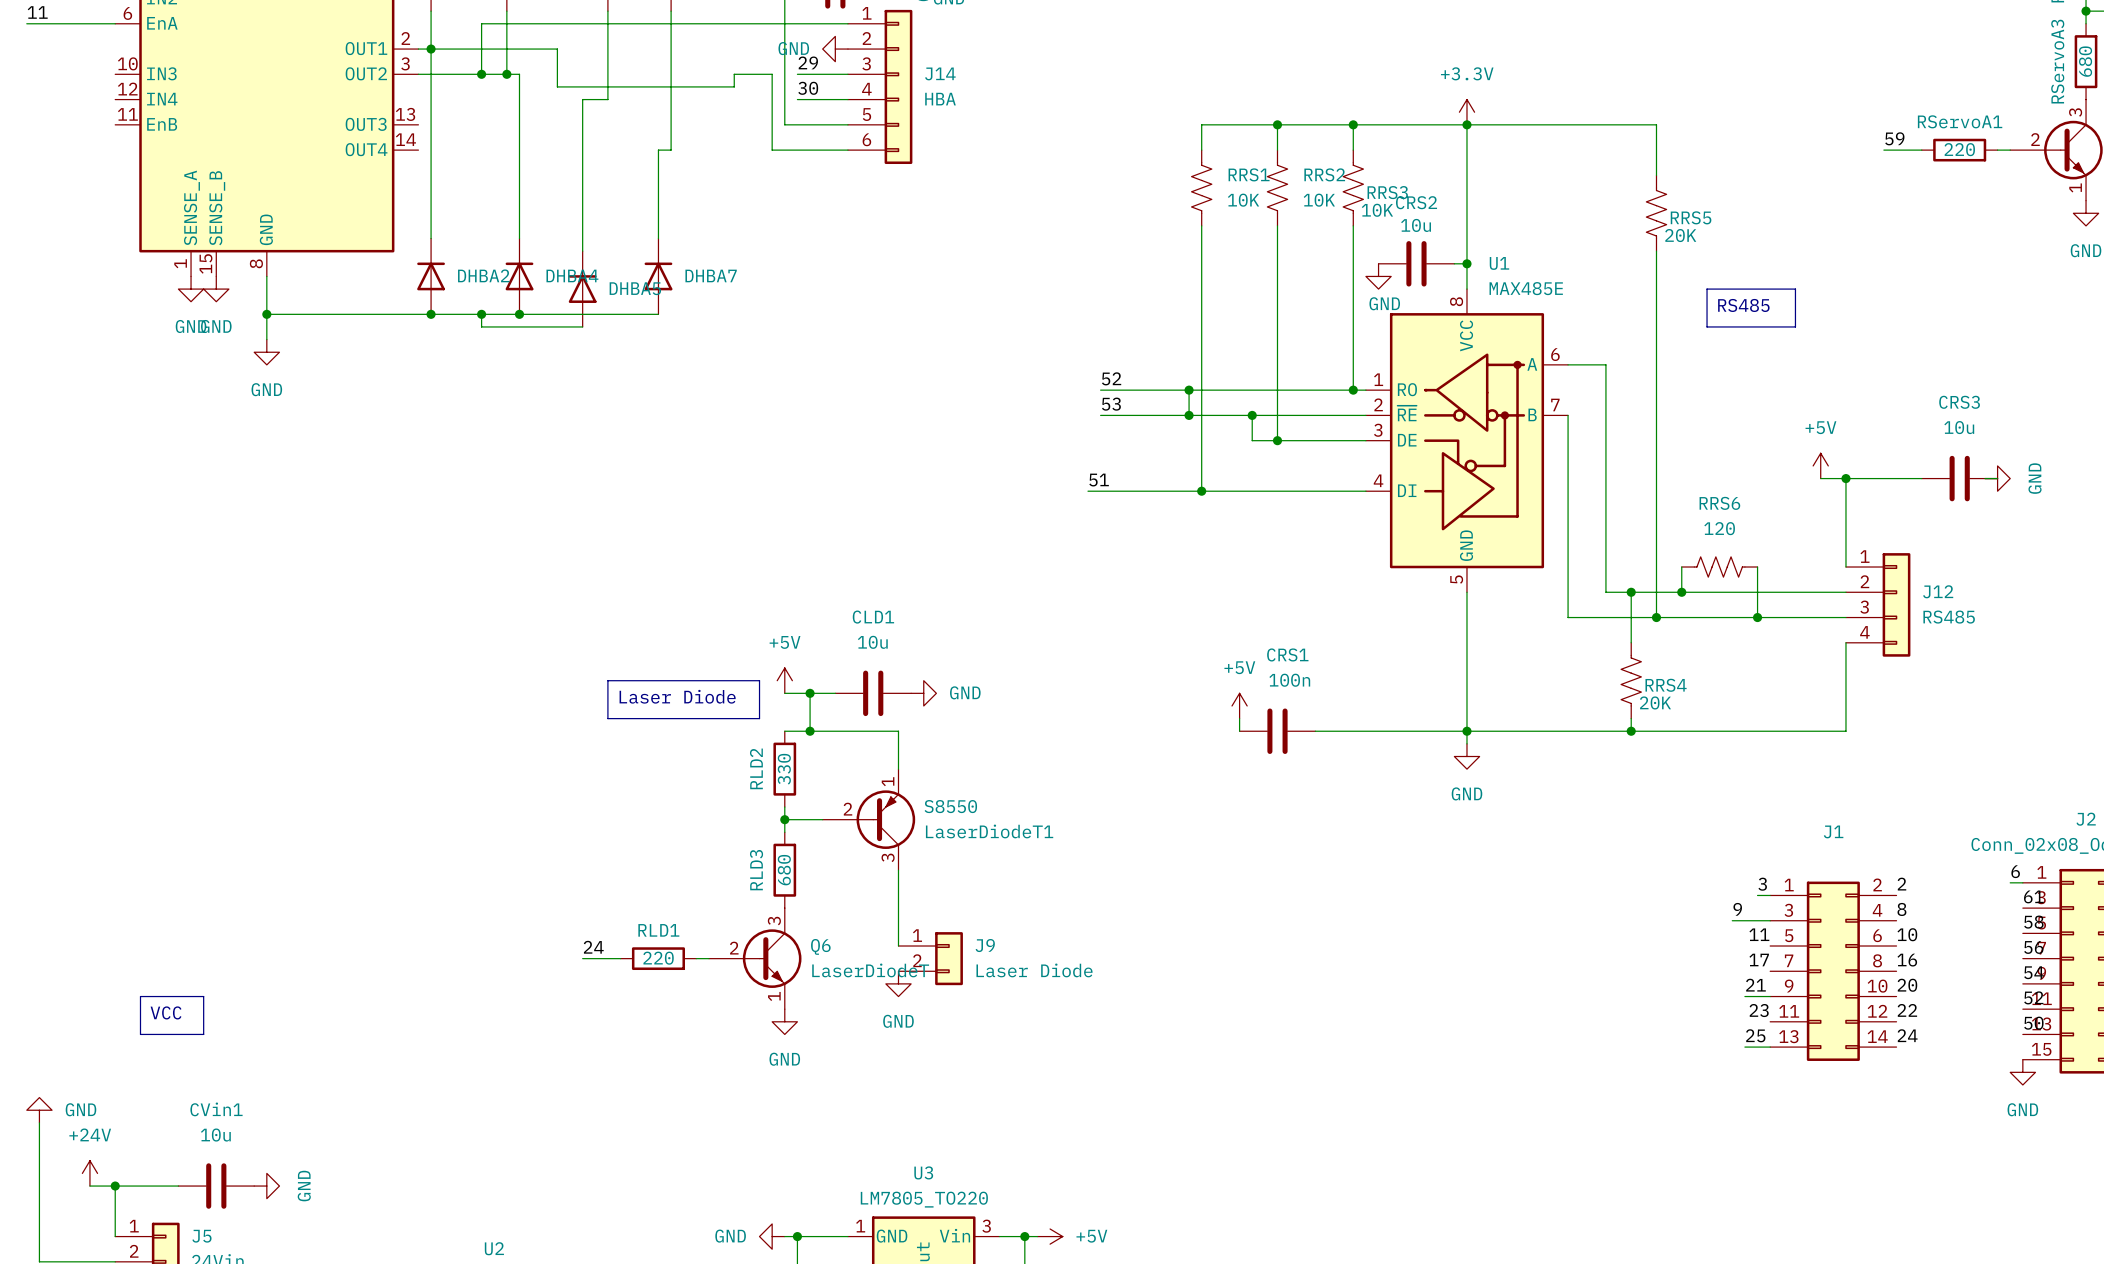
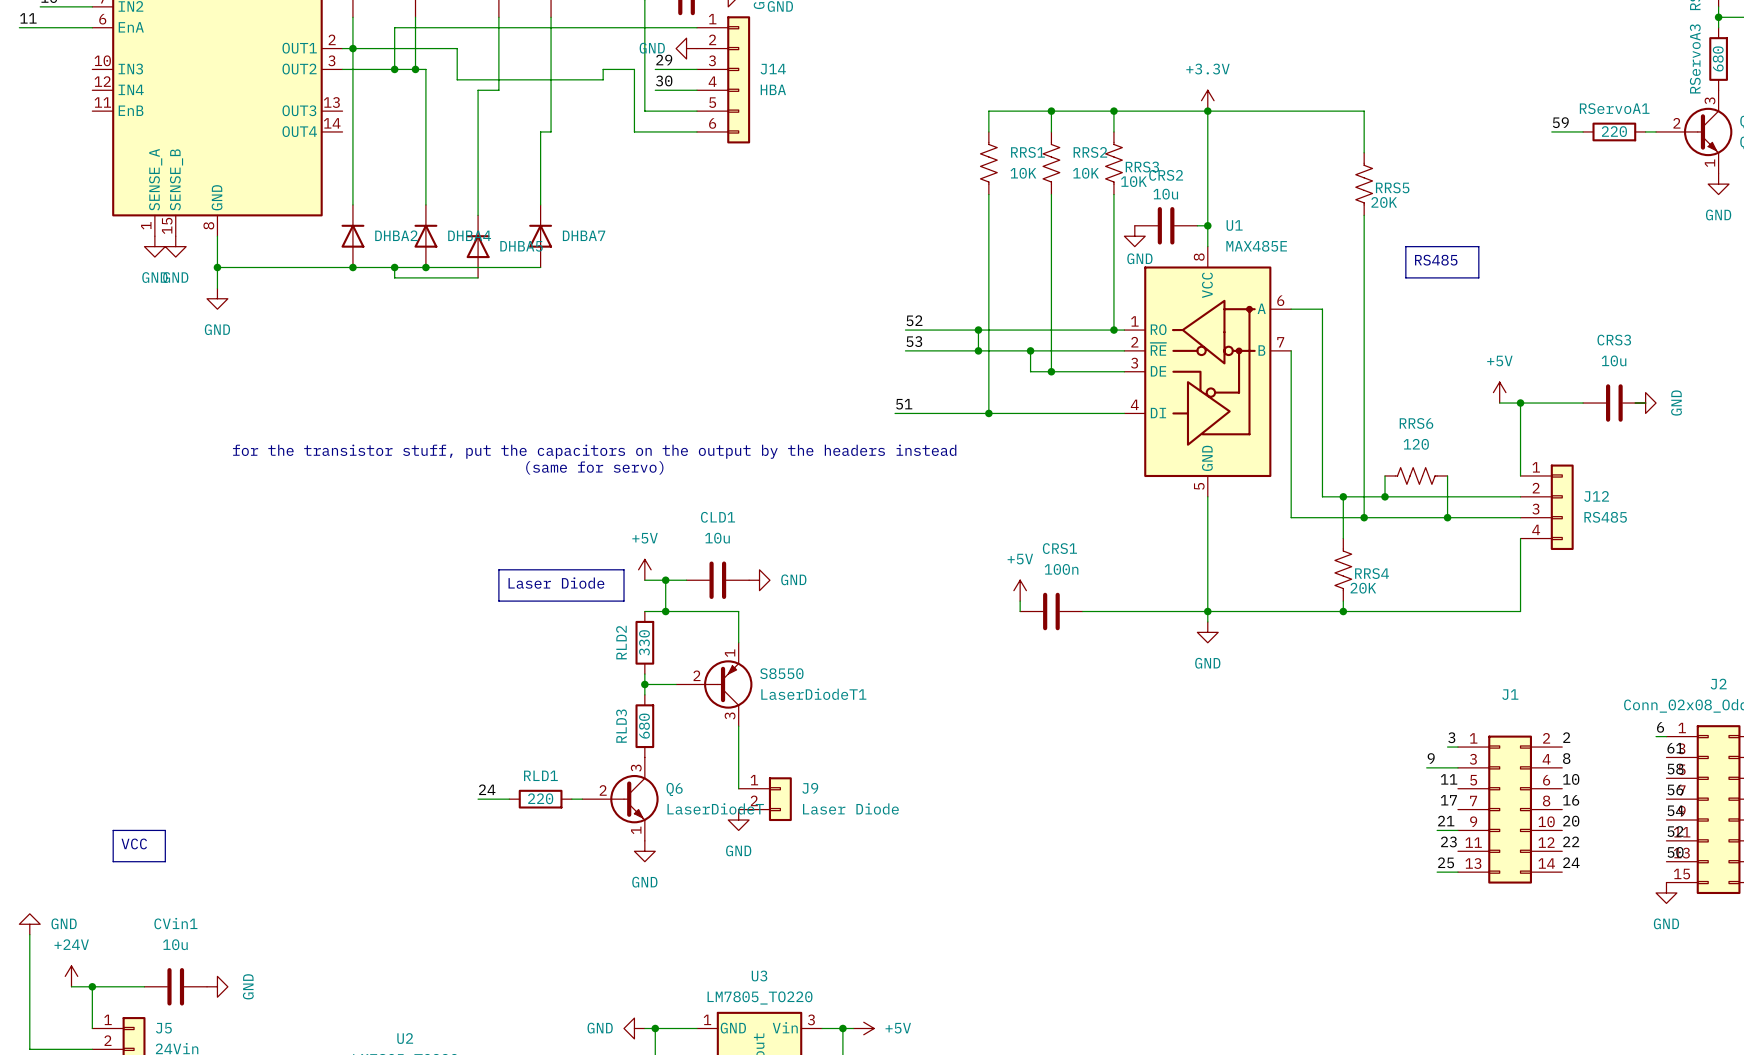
text: none -> for the transistor stuff, put the capacitors on the output by the headers instead (594, 451)
text: none -> (same for servo) (594, 467)

